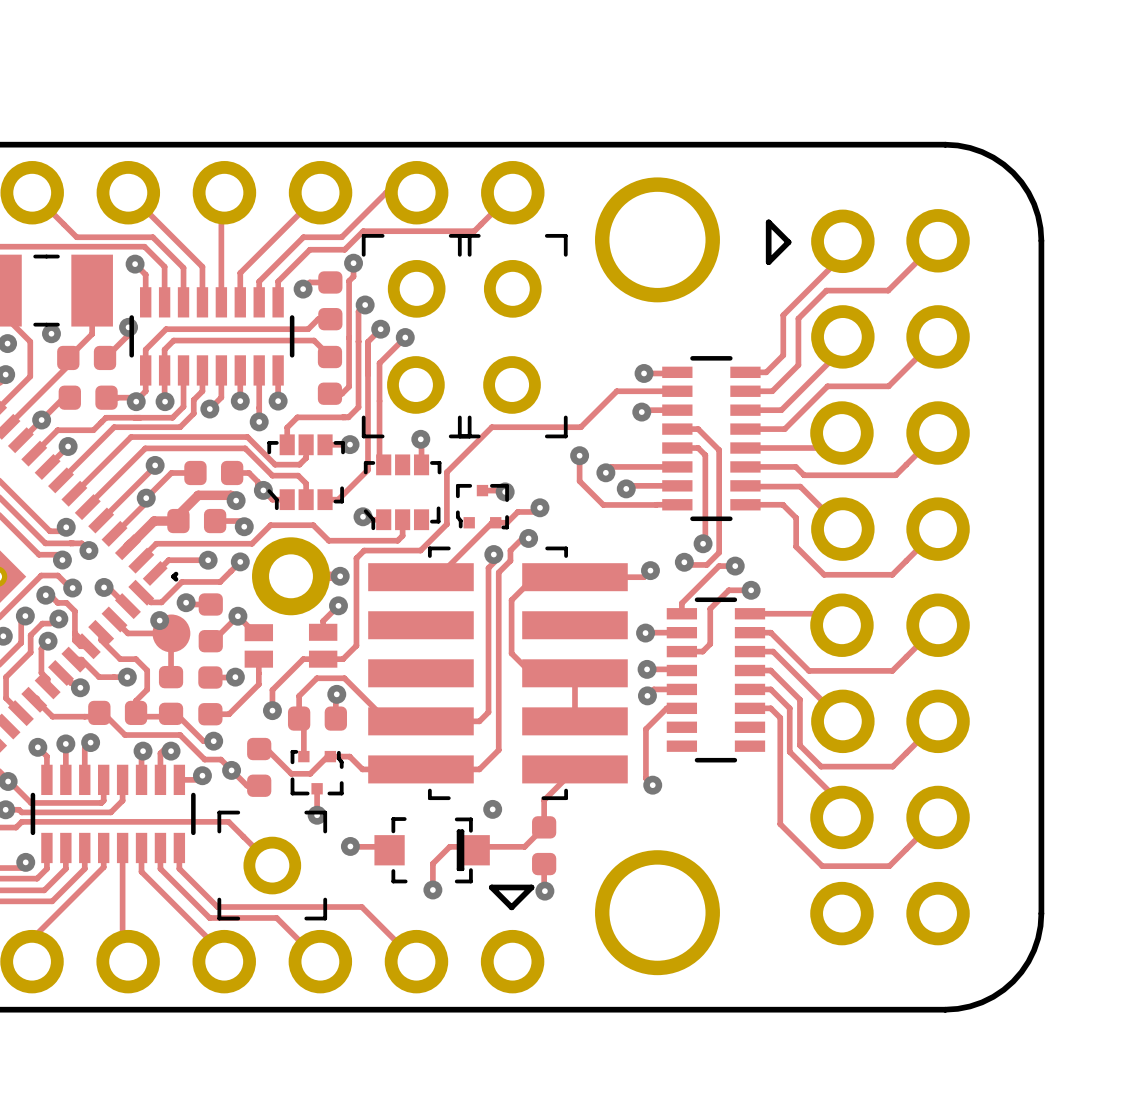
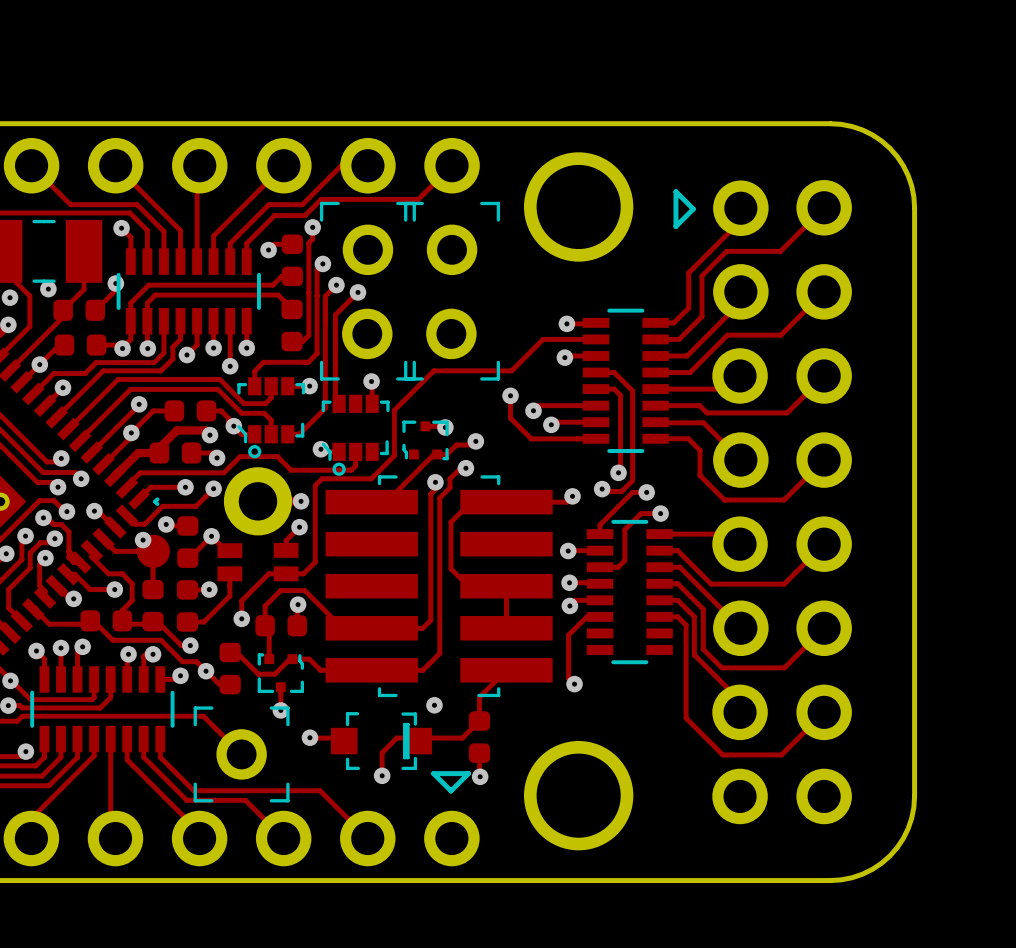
part footprint: [267, 434, 345, 511] -> [237, 377, 306, 459]
part footprint: [363, 454, 442, 531] -> [321, 394, 390, 476]

